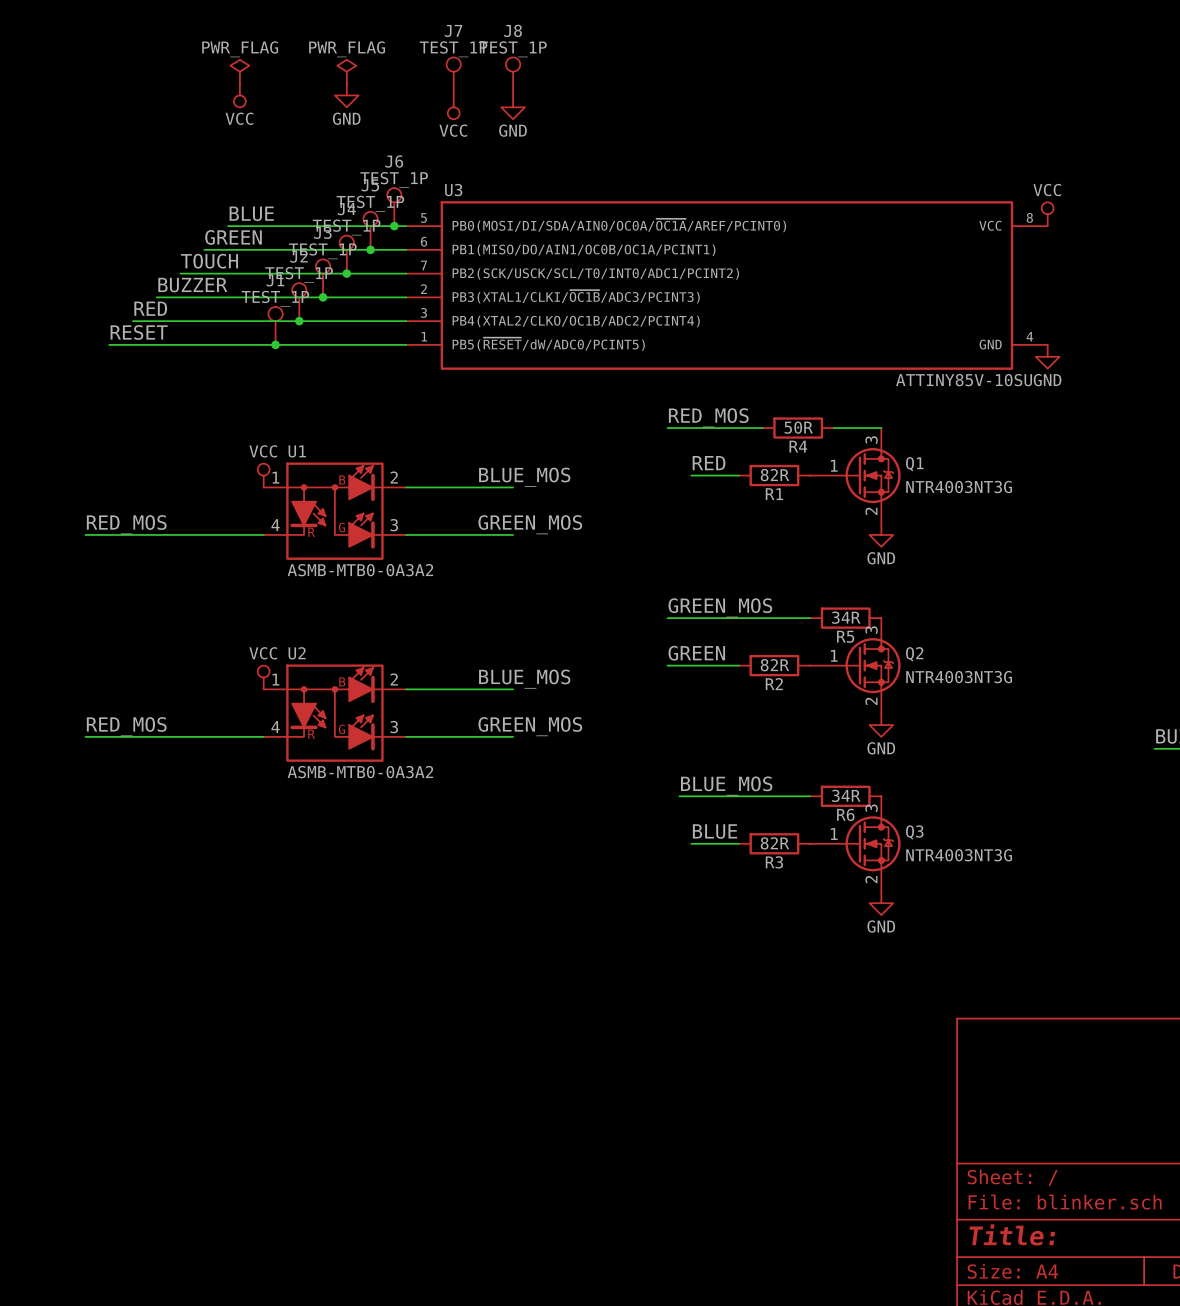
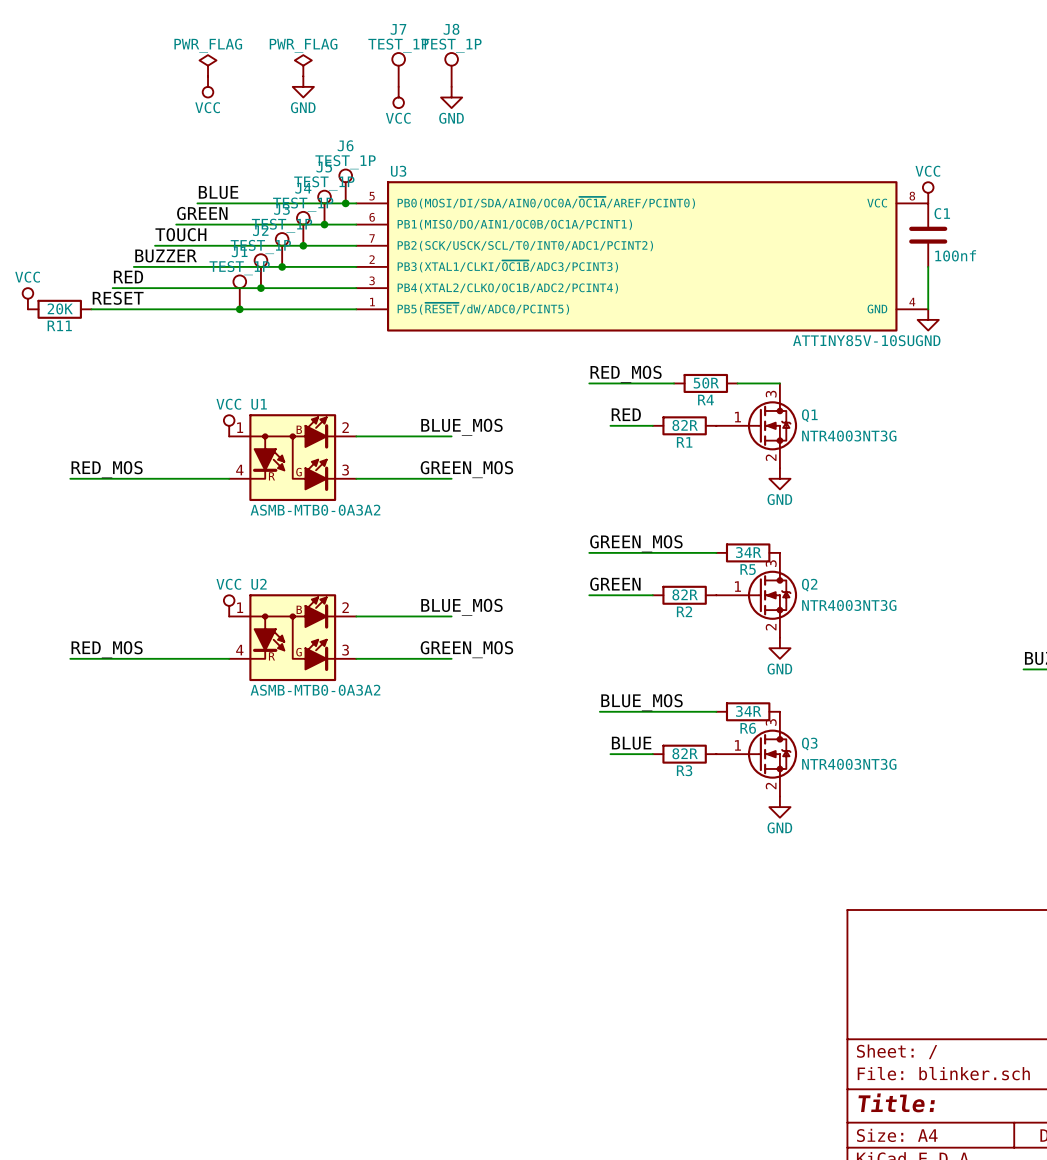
C1: none -> 100nf (928, 235)
wire: none -> (928, 266) (928, 309)
power symbol: none -> VCC (27, 298)
R11: none -> 20K (59, 309)

